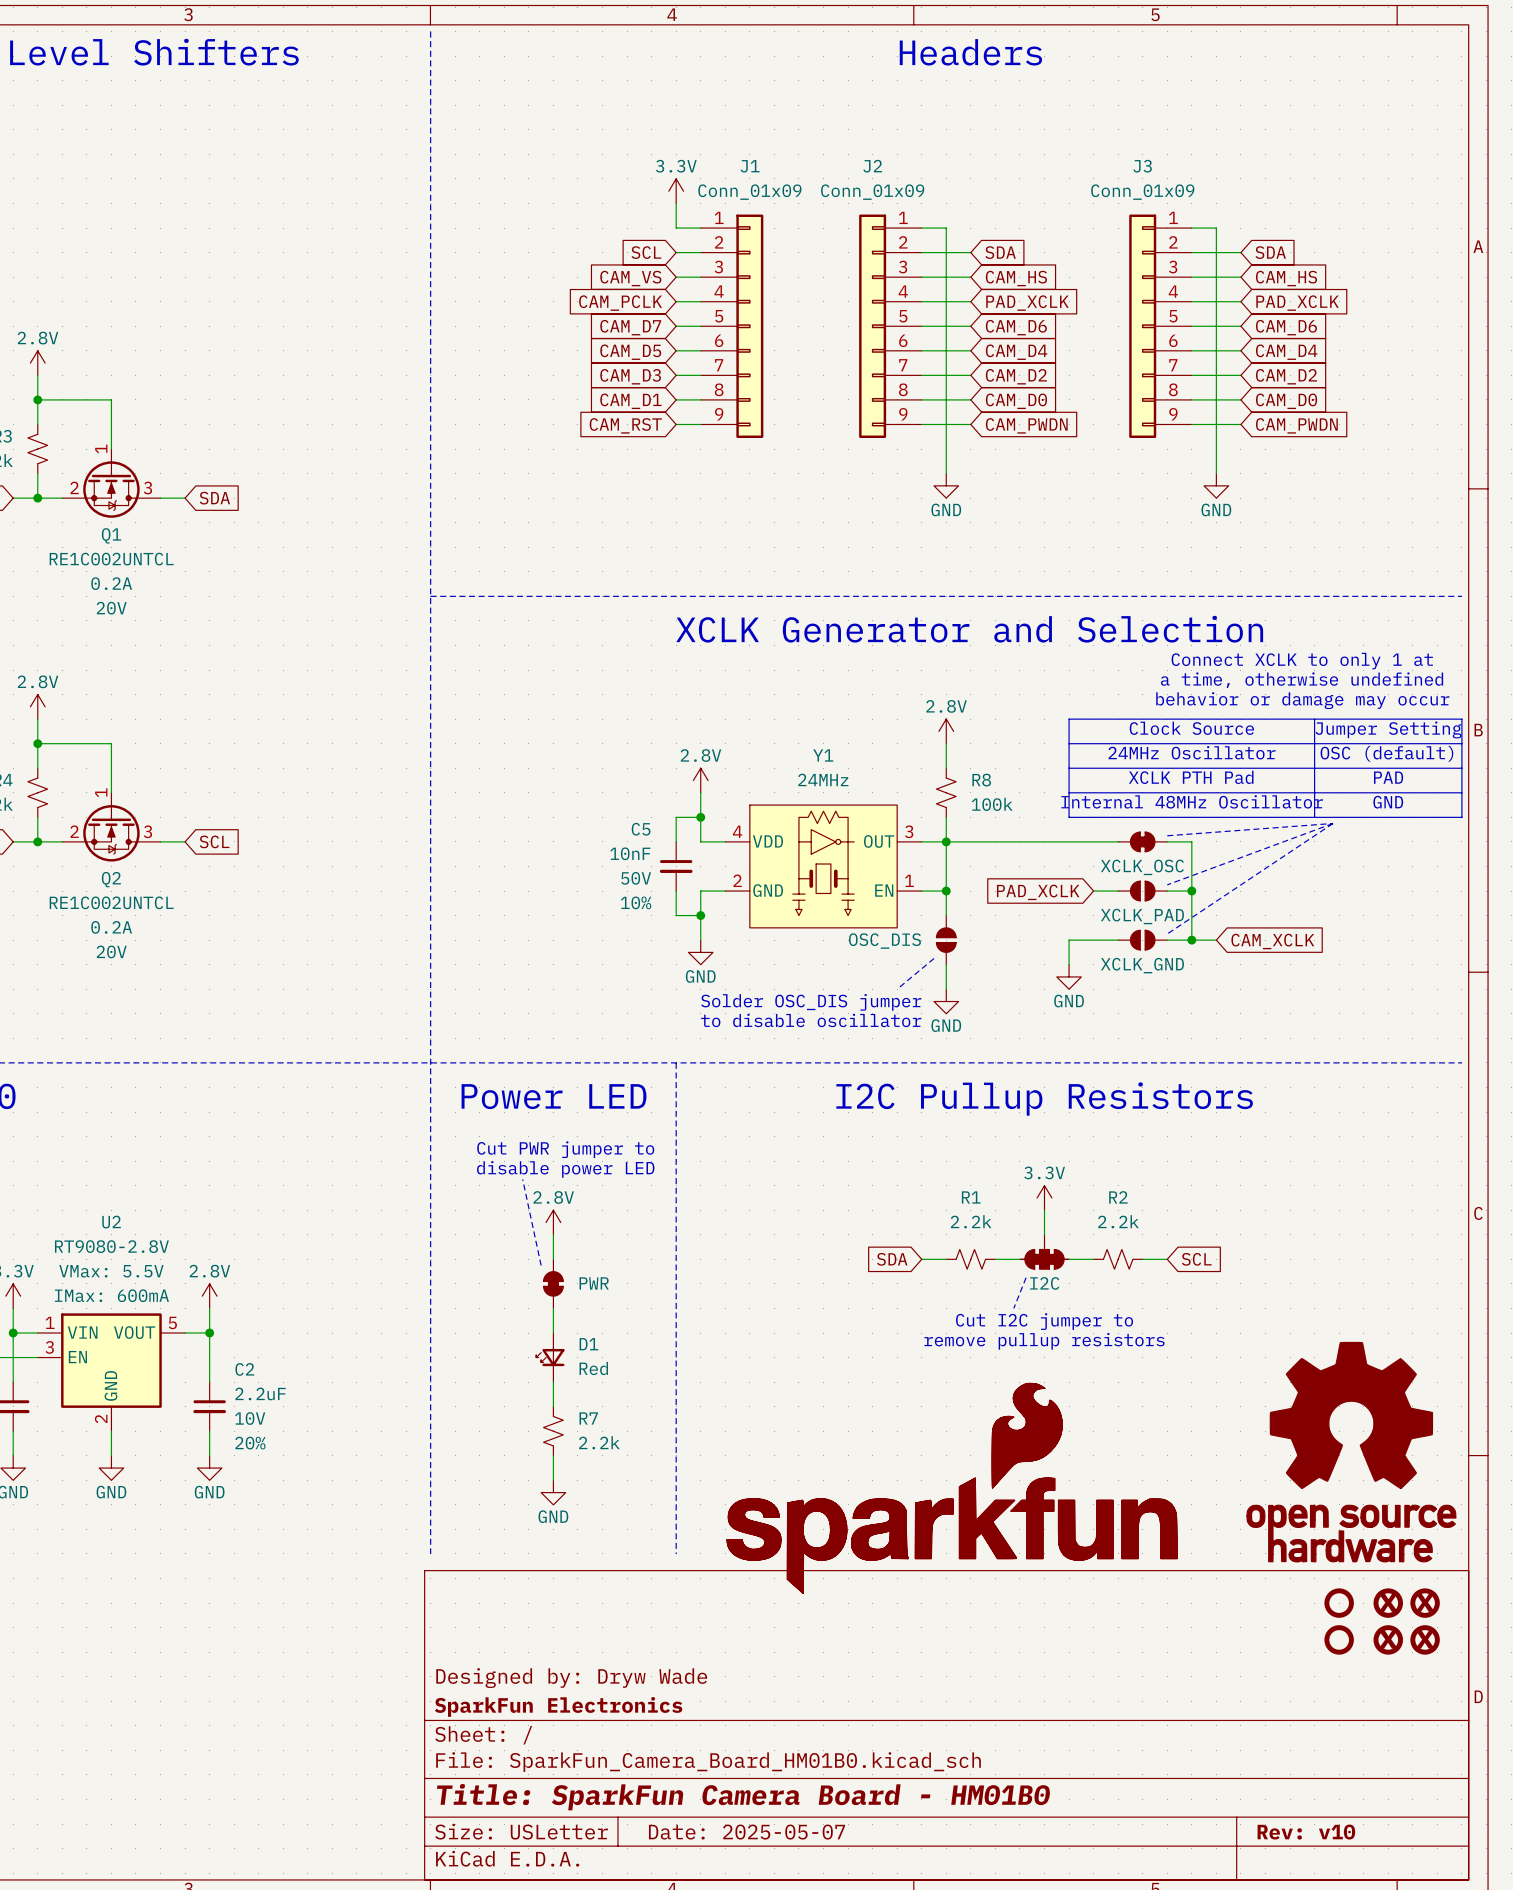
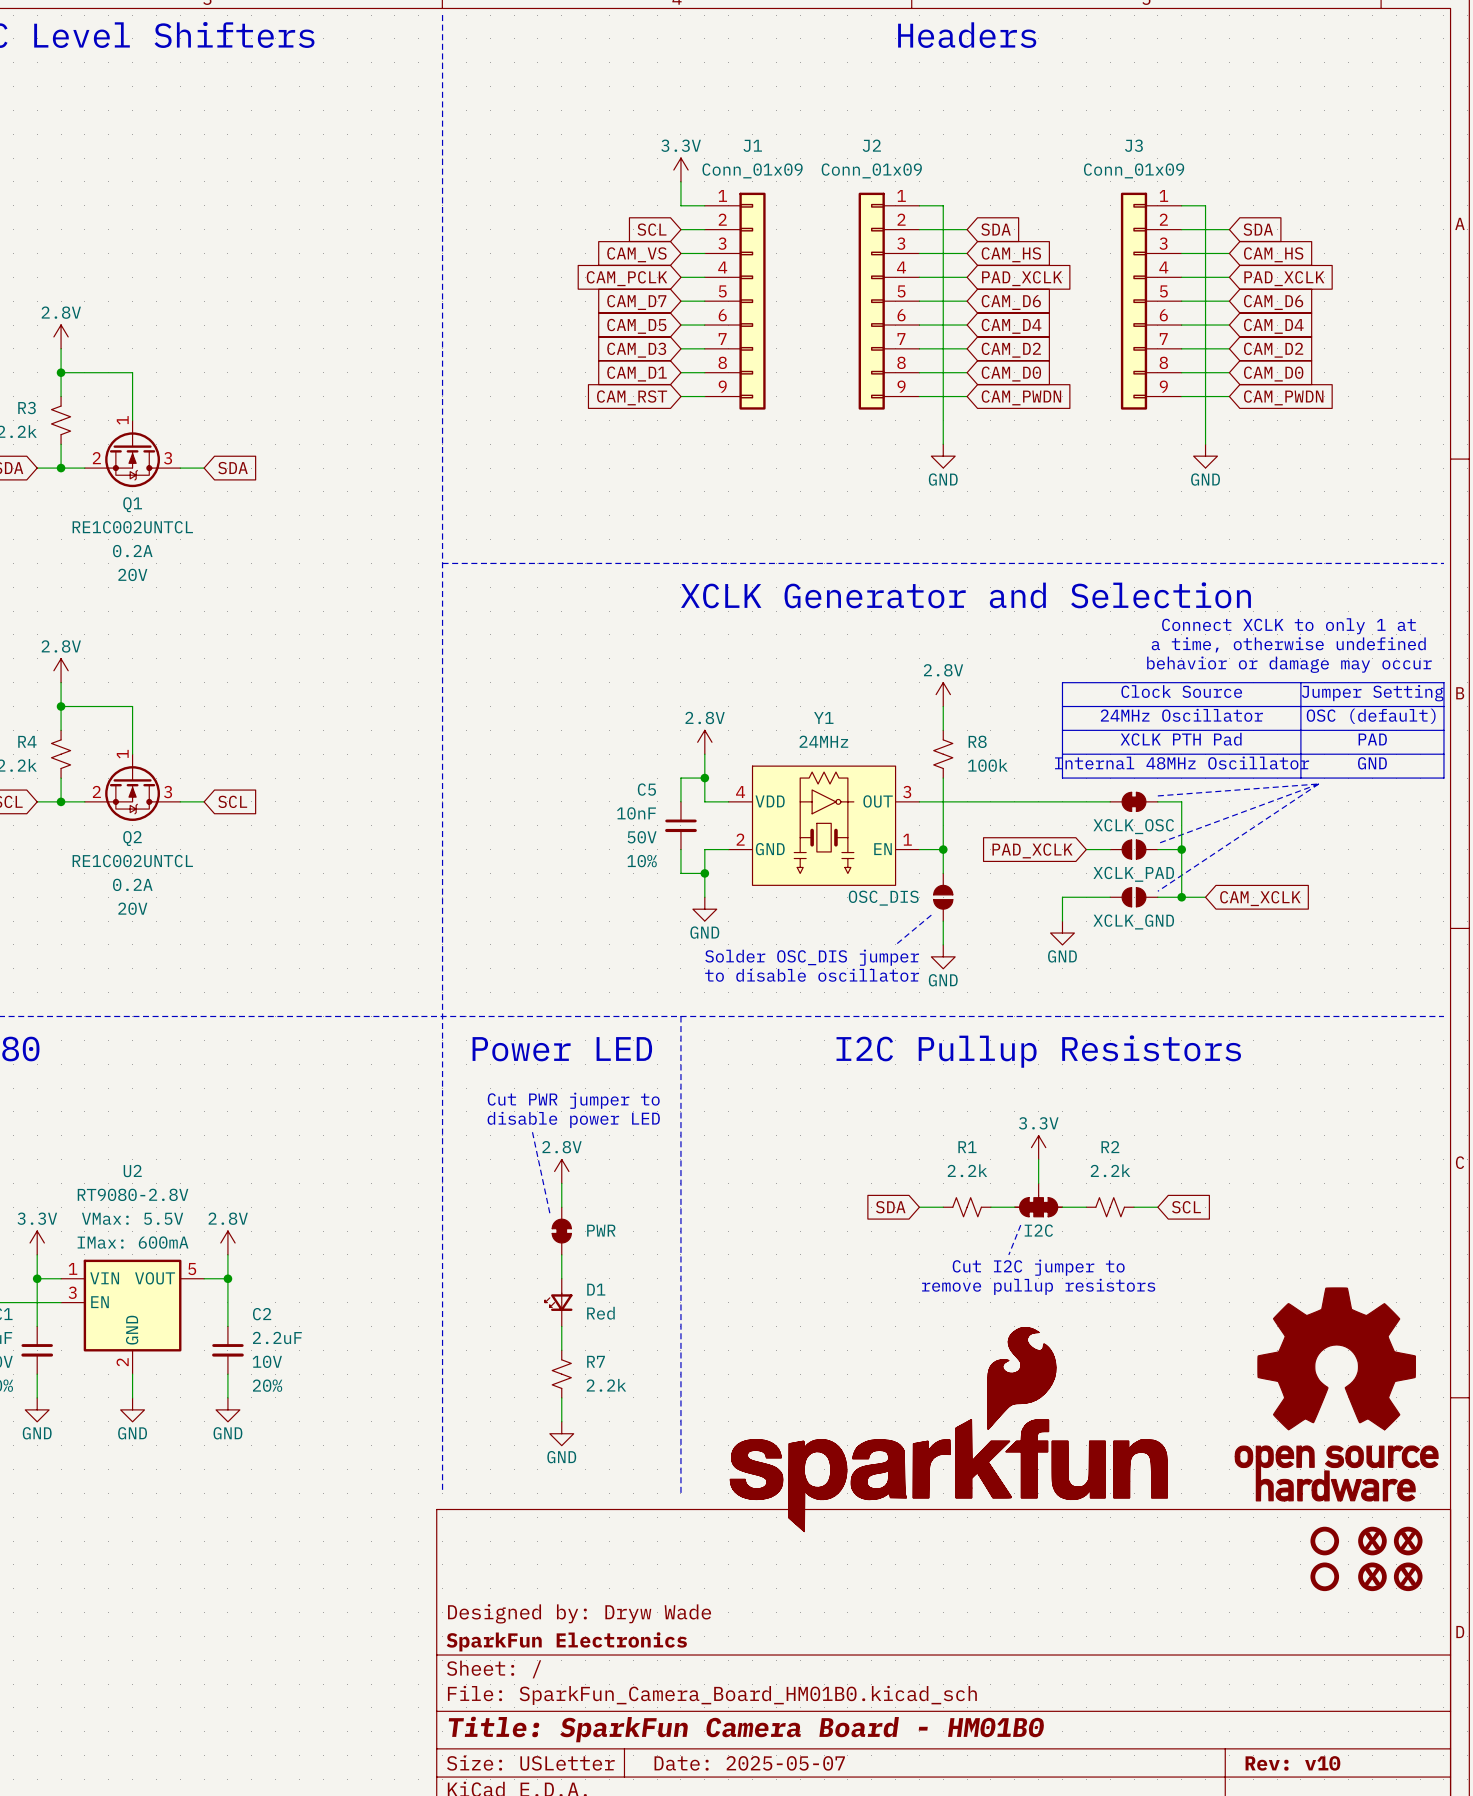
junction: (946, 841) -> none

